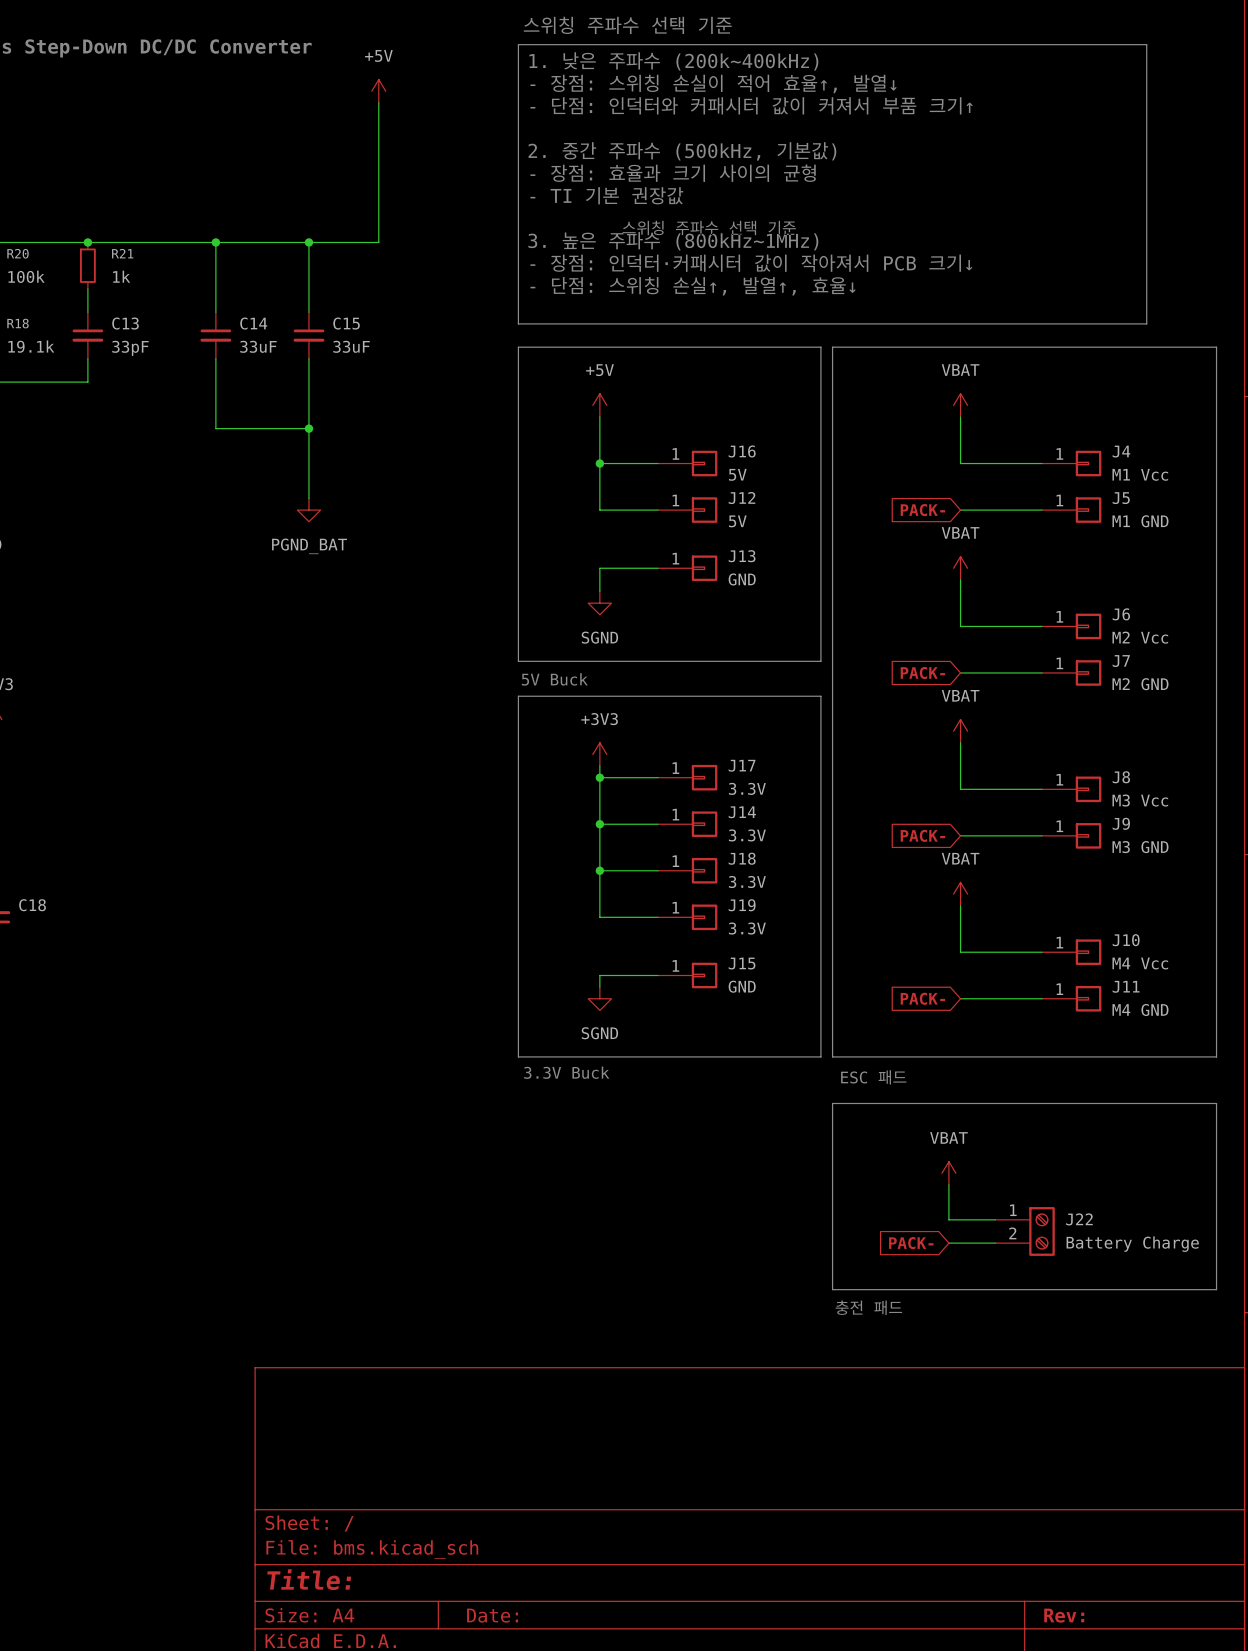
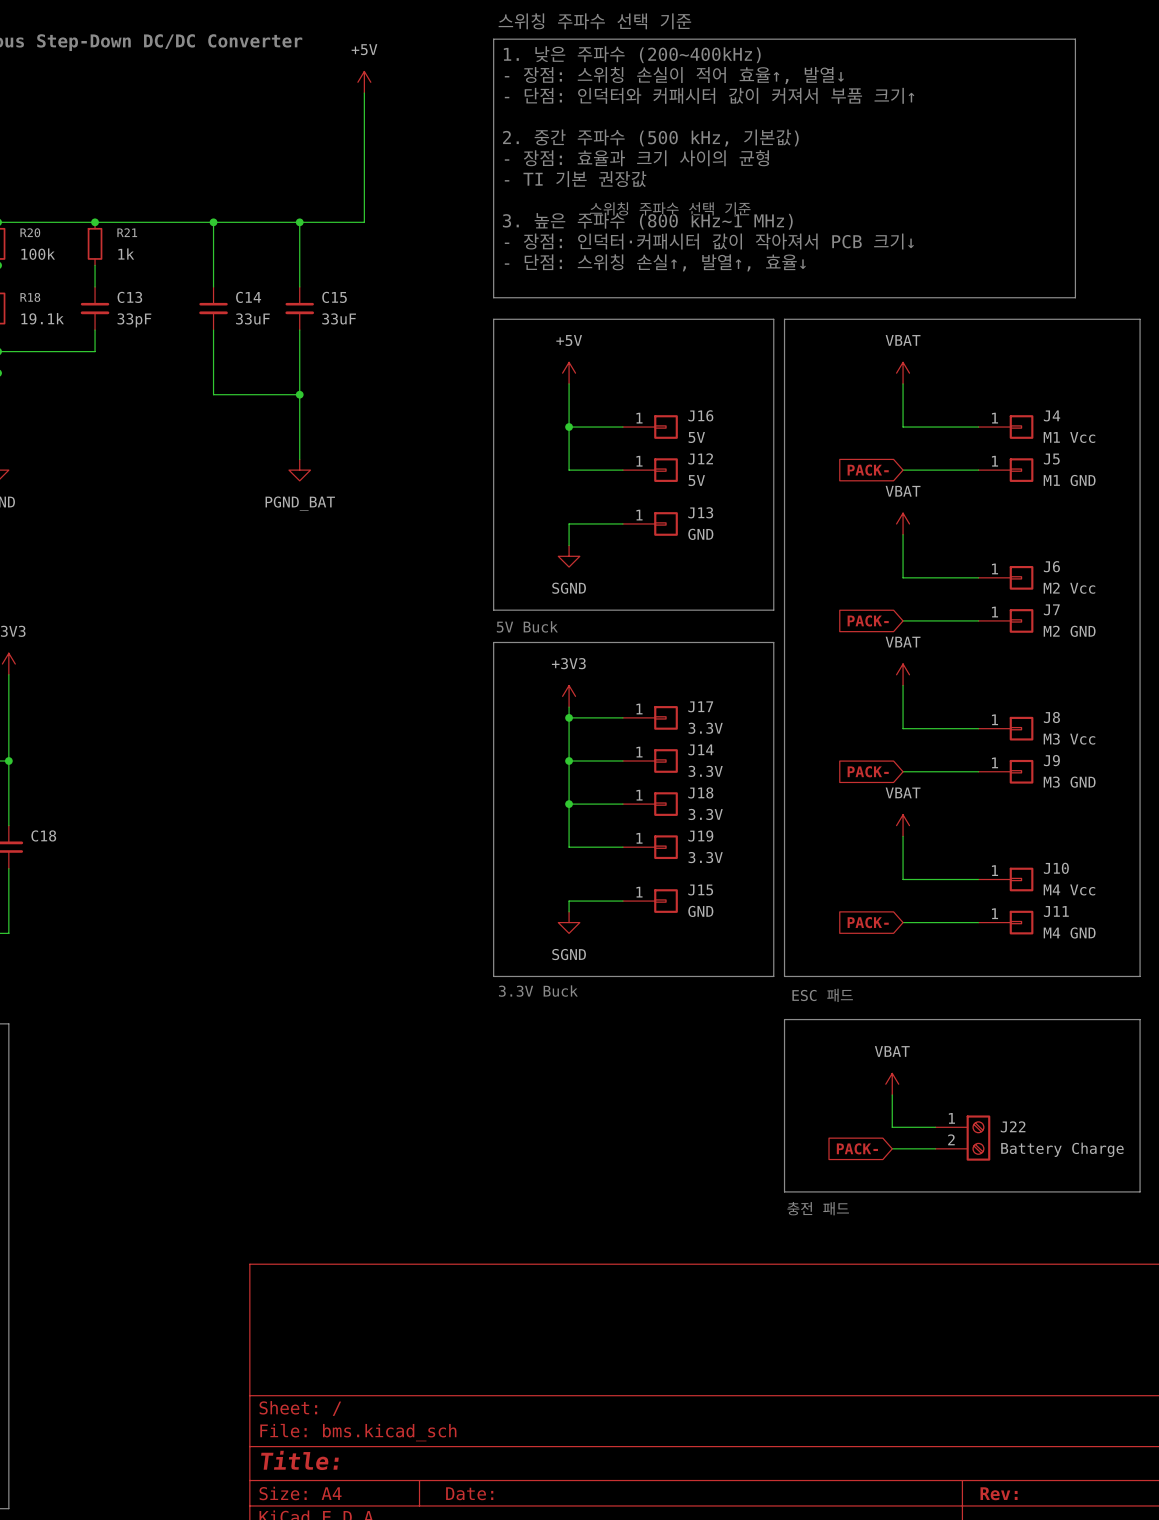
text: 1. 낮은 주파수 (200k~400kHz) (673, 61) -> 1. 낮은 주파수 (200~400kHz) (632, 54)
text: 2. 중간 주파수 (500kHz, 기본값) (682, 151) -> 2. 중간 주파수 (500 kHz, 기본값) (650, 138)
text: 3. 높은 주파수 (800kHz~1MHz) (673, 241) -> 3. 높은 주파수 (800 kHz~1 MHz) (647, 221)

